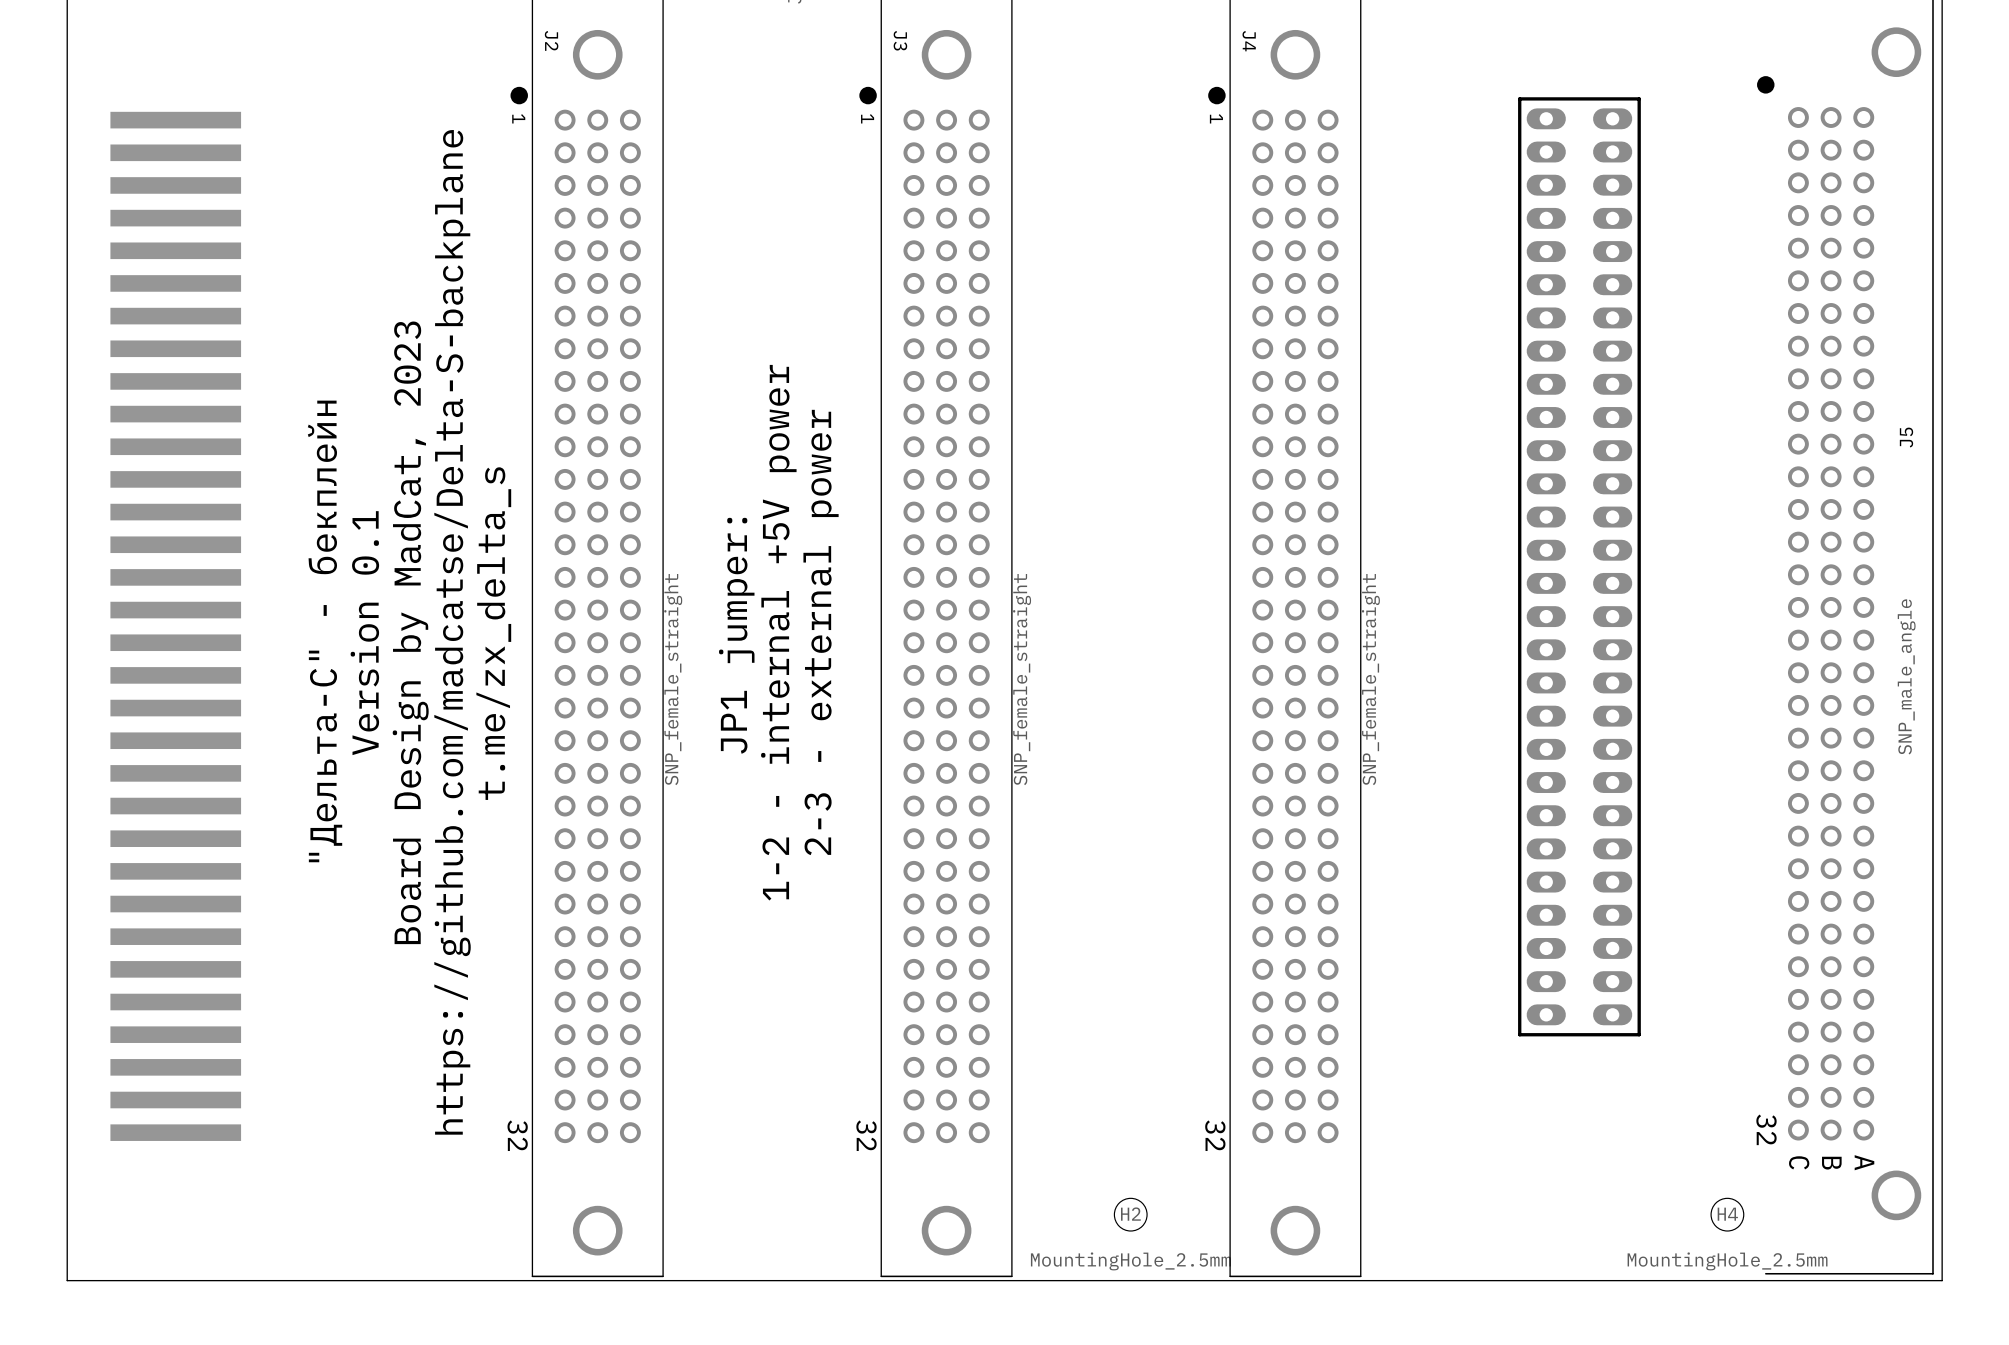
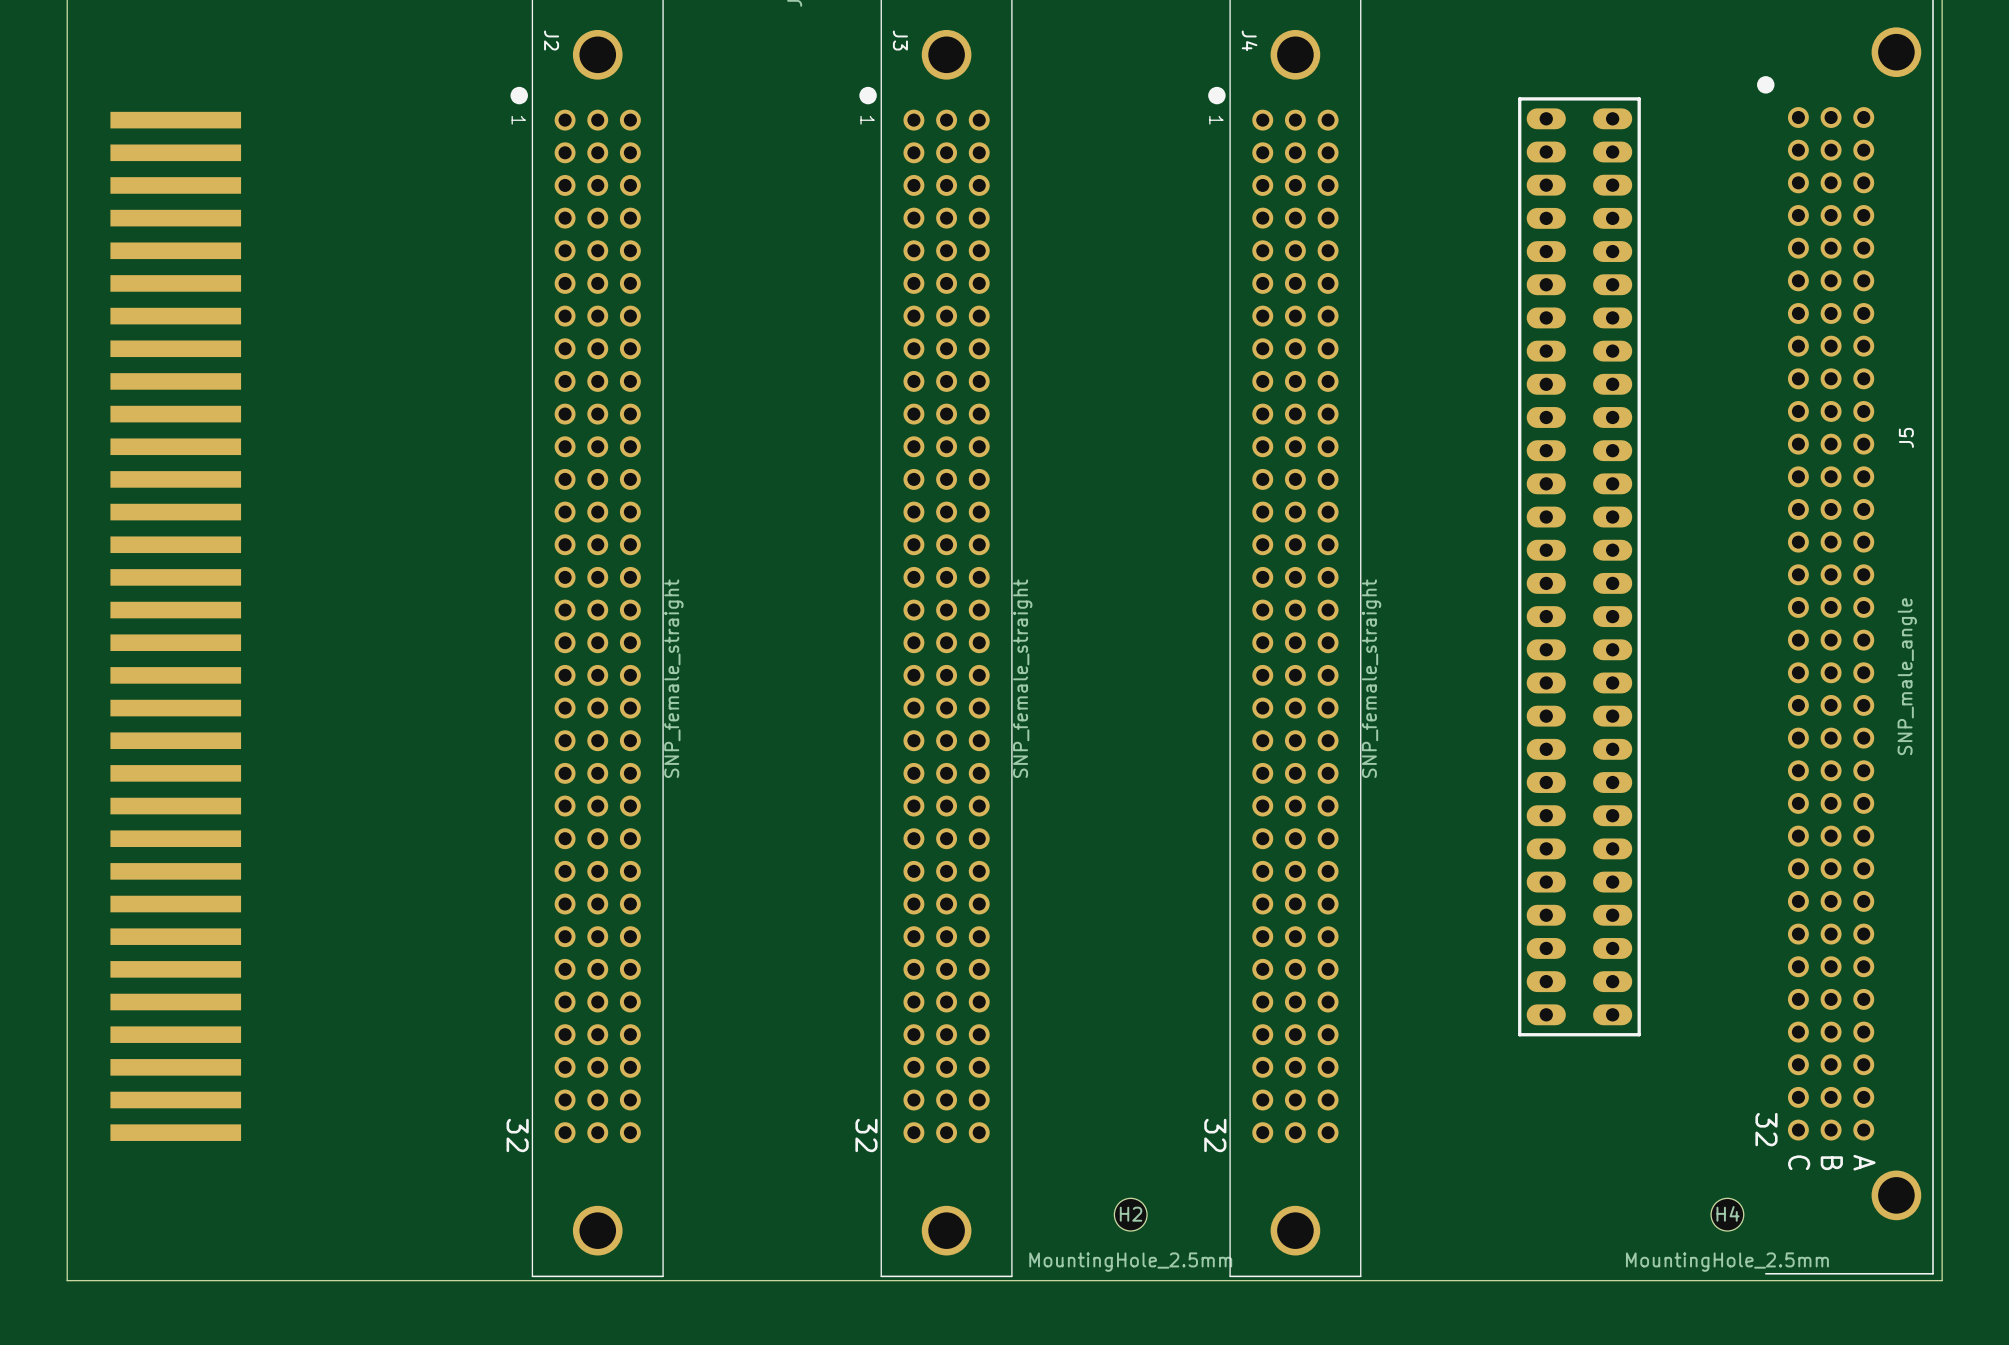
text: "Дельта-С" - бекплейн (325, 631) -> none
text: Board Design by MadCat, 2023 (410, 632) -> none
text: https://github.com/madcatse/Delta-S-backplane (452, 632) -> none
text: 1-2 - internal +5V power (778, 632) -> none
text: 2-3 - external power (821, 632) -> none
text: Version 0.1 (364, 633) -> none
text: t.me/zx_delta_s (493, 633) -> none
text: JP1 jumper: (736, 635) -> none

